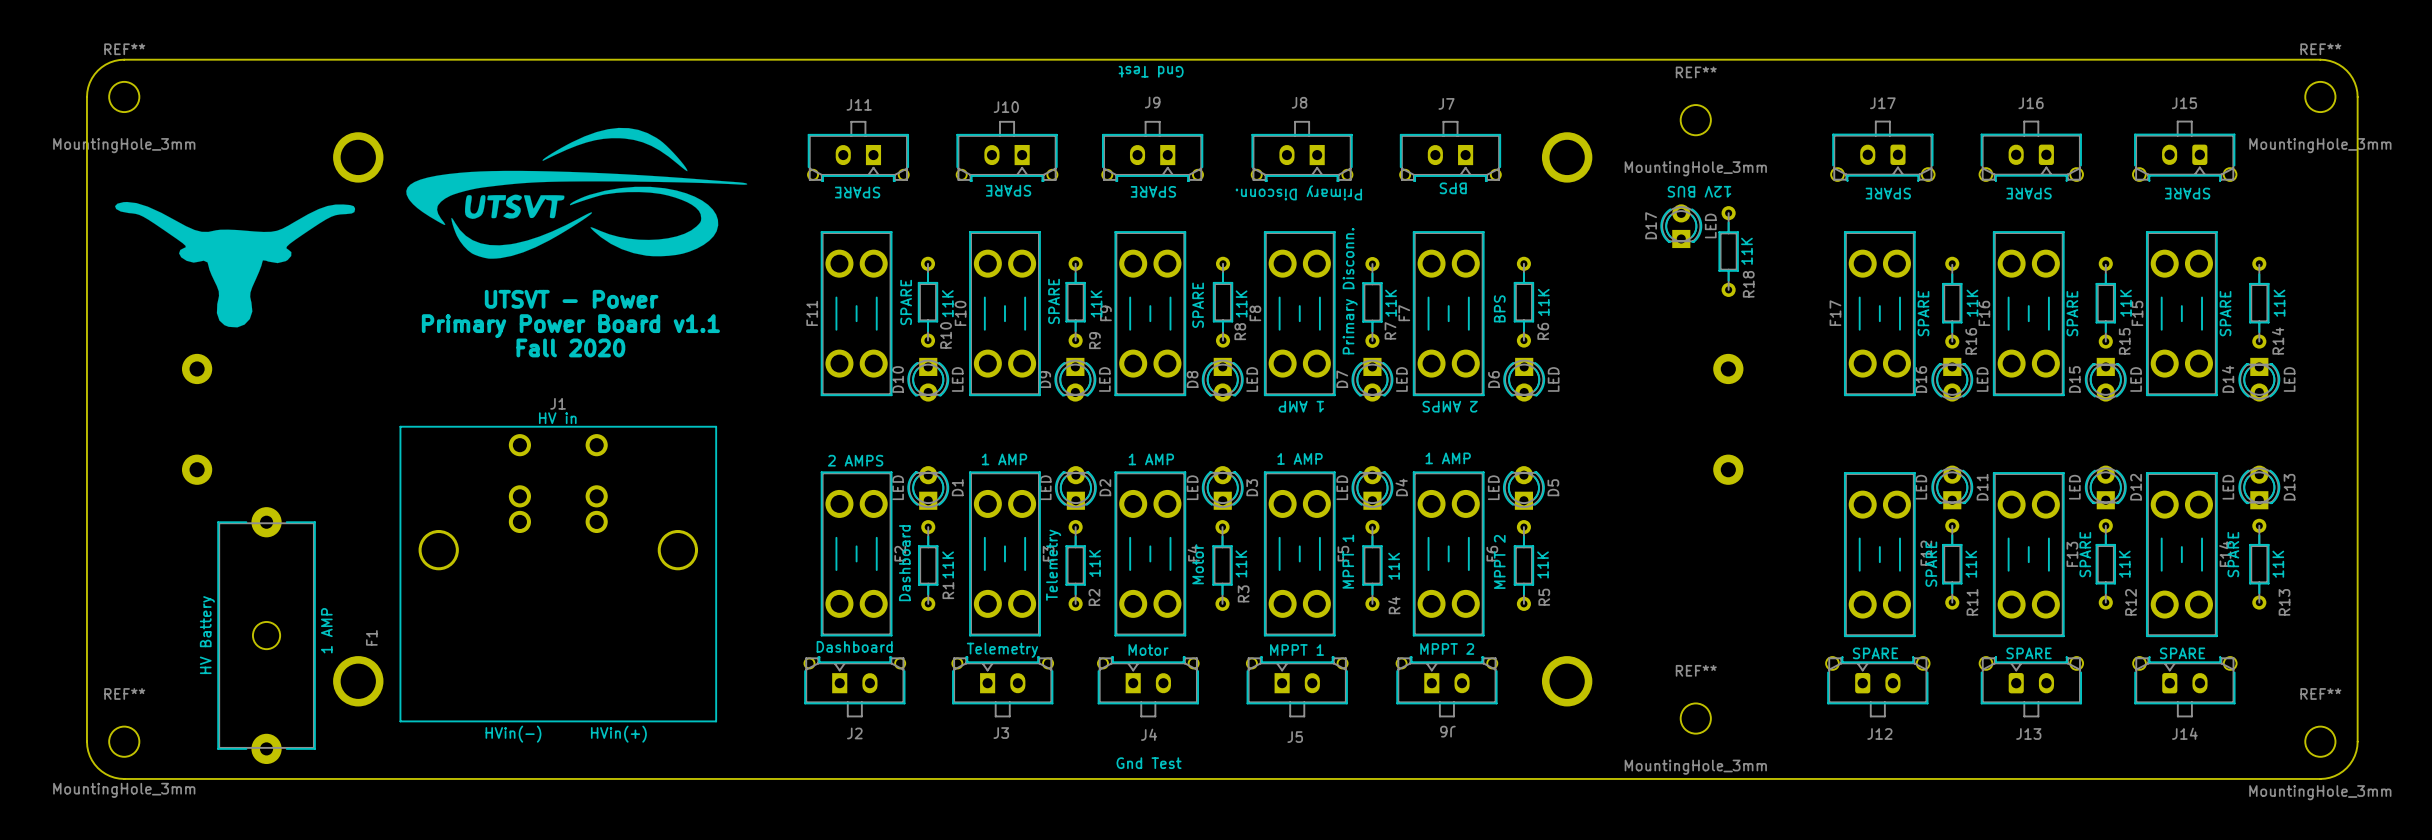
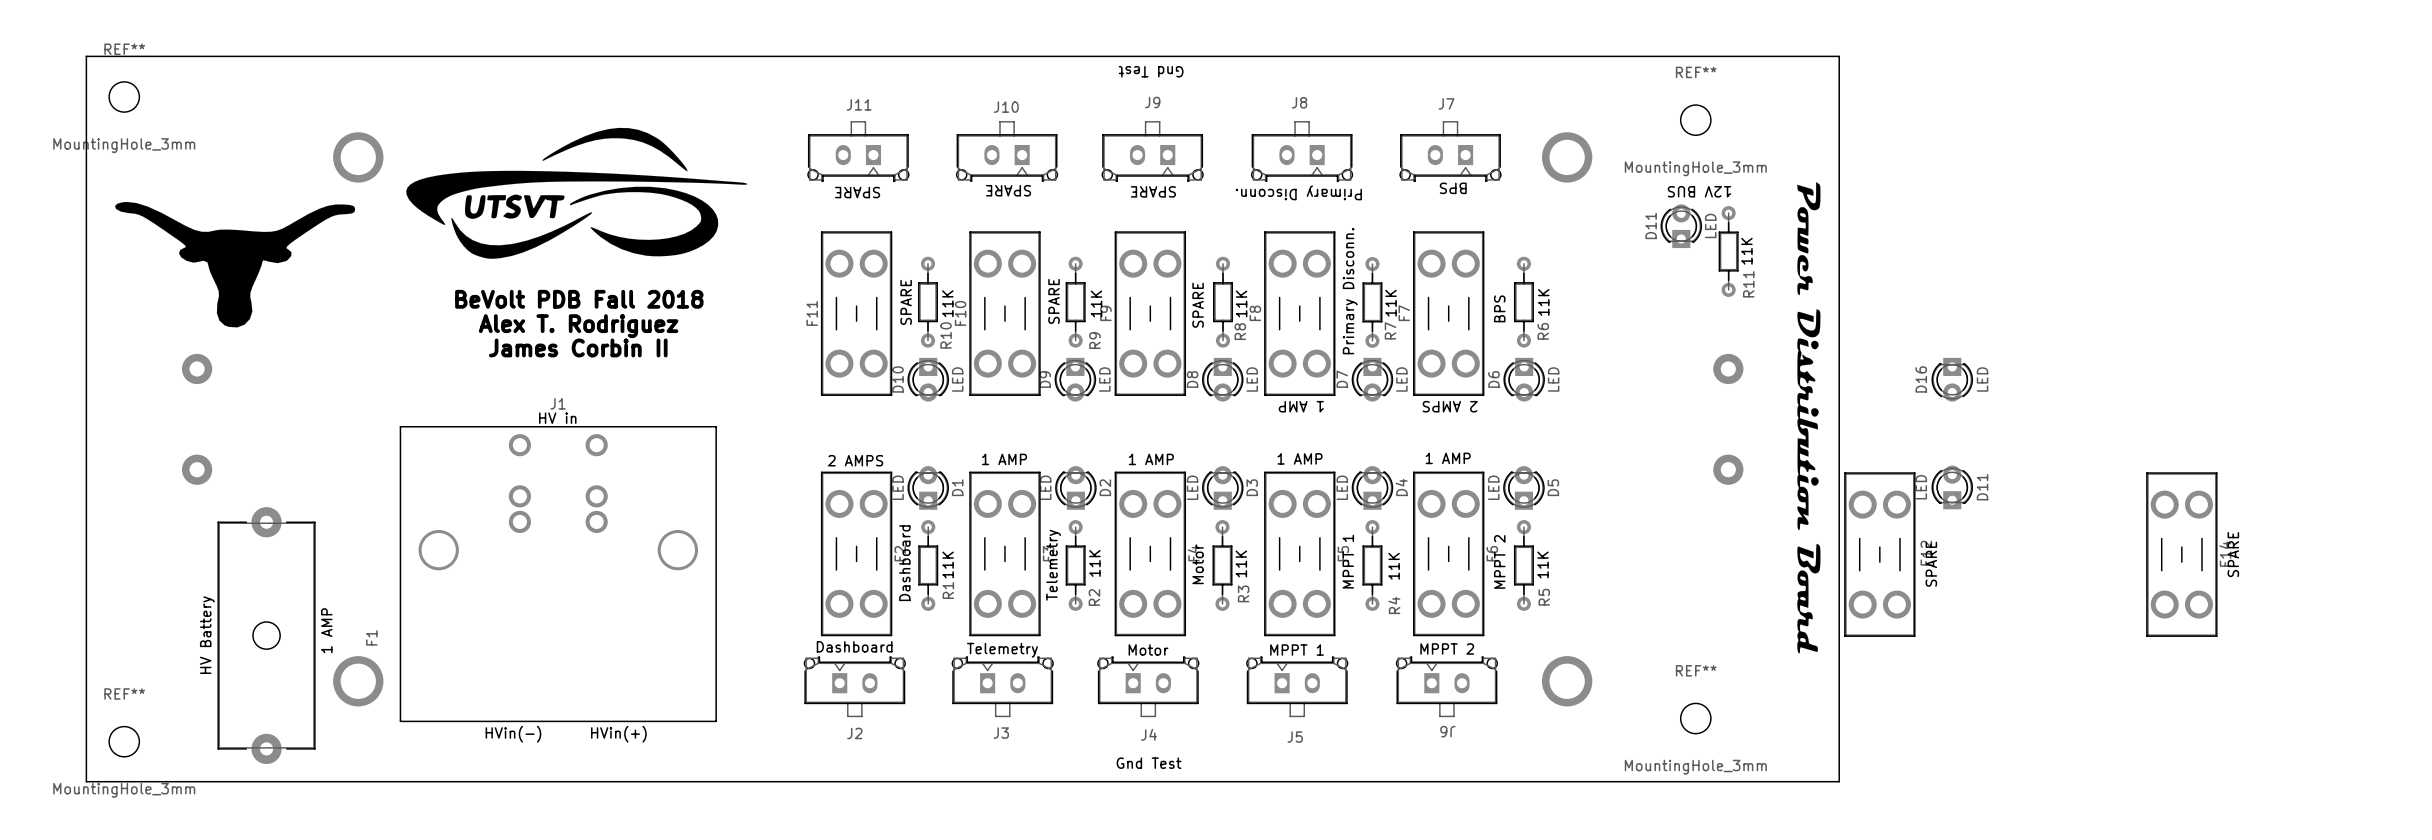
board edge: (124, 59) (2330, 60) (2339, 64) (2349, 74) (2354, 82) (2357, 96) (2356, 751) (2352, 760) (2343, 771) (2334, 776) (2320, 778) (114, 777) (105, 773) (94, 764) (89, 755) (86, 741) (86, 96) (89, 82) (97, 70) (109, 62) (124, 59) -> (86, 56) (86, 781) (1839, 781) (1839, 56) (86, 56)
REF**: MountingHole_3mm (2320, 96) -> none
J17: SPARE (1882, 151) -> none
J16: SPARE (2031, 151) -> none
J15: SPARE (2184, 151) -> none
drawing: none -> [1797, 182, 1821, 654]
D17 name: D17 (1651, 225) -> D11 (1651, 225)
R18 name: R18 (1748, 284) -> R11 (1748, 284)
text: UTSVT - Power (571, 299) -> BeVolt PDB Fall 2018 (579, 299)
R16: 11K (1952, 302) -> none
R15: 11K (2105, 302) -> none
R14: 11K (2259, 302) -> none
F17: SPARE (1879, 313) -> none
F16: SPARE (2028, 313) -> none
F15: SPARE (2181, 313) -> none
text: Primary Power Board v1.1 (570, 326) -> Alex T. Rodriguez (578, 326)
text: Fall 2020 (570, 347) -> James Corbin II (578, 347)
D15: LED (2105, 379) -> none
D14: LED (2259, 379) -> none
D12: LED (2105, 487) -> none
D13: LED (2259, 487) -> none
F13: SPARE (2028, 554) -> none
R11: 11K (1952, 564) -> none
R12: 11K (2105, 564) -> none
R13: 11K (2259, 564) -> none
J12: SPARE (1877, 686) -> none
J13: SPARE (2031, 686) -> none
J14: SPARE (2184, 686) -> none
REF**: MountingHole_3mm (2320, 741) -> none

